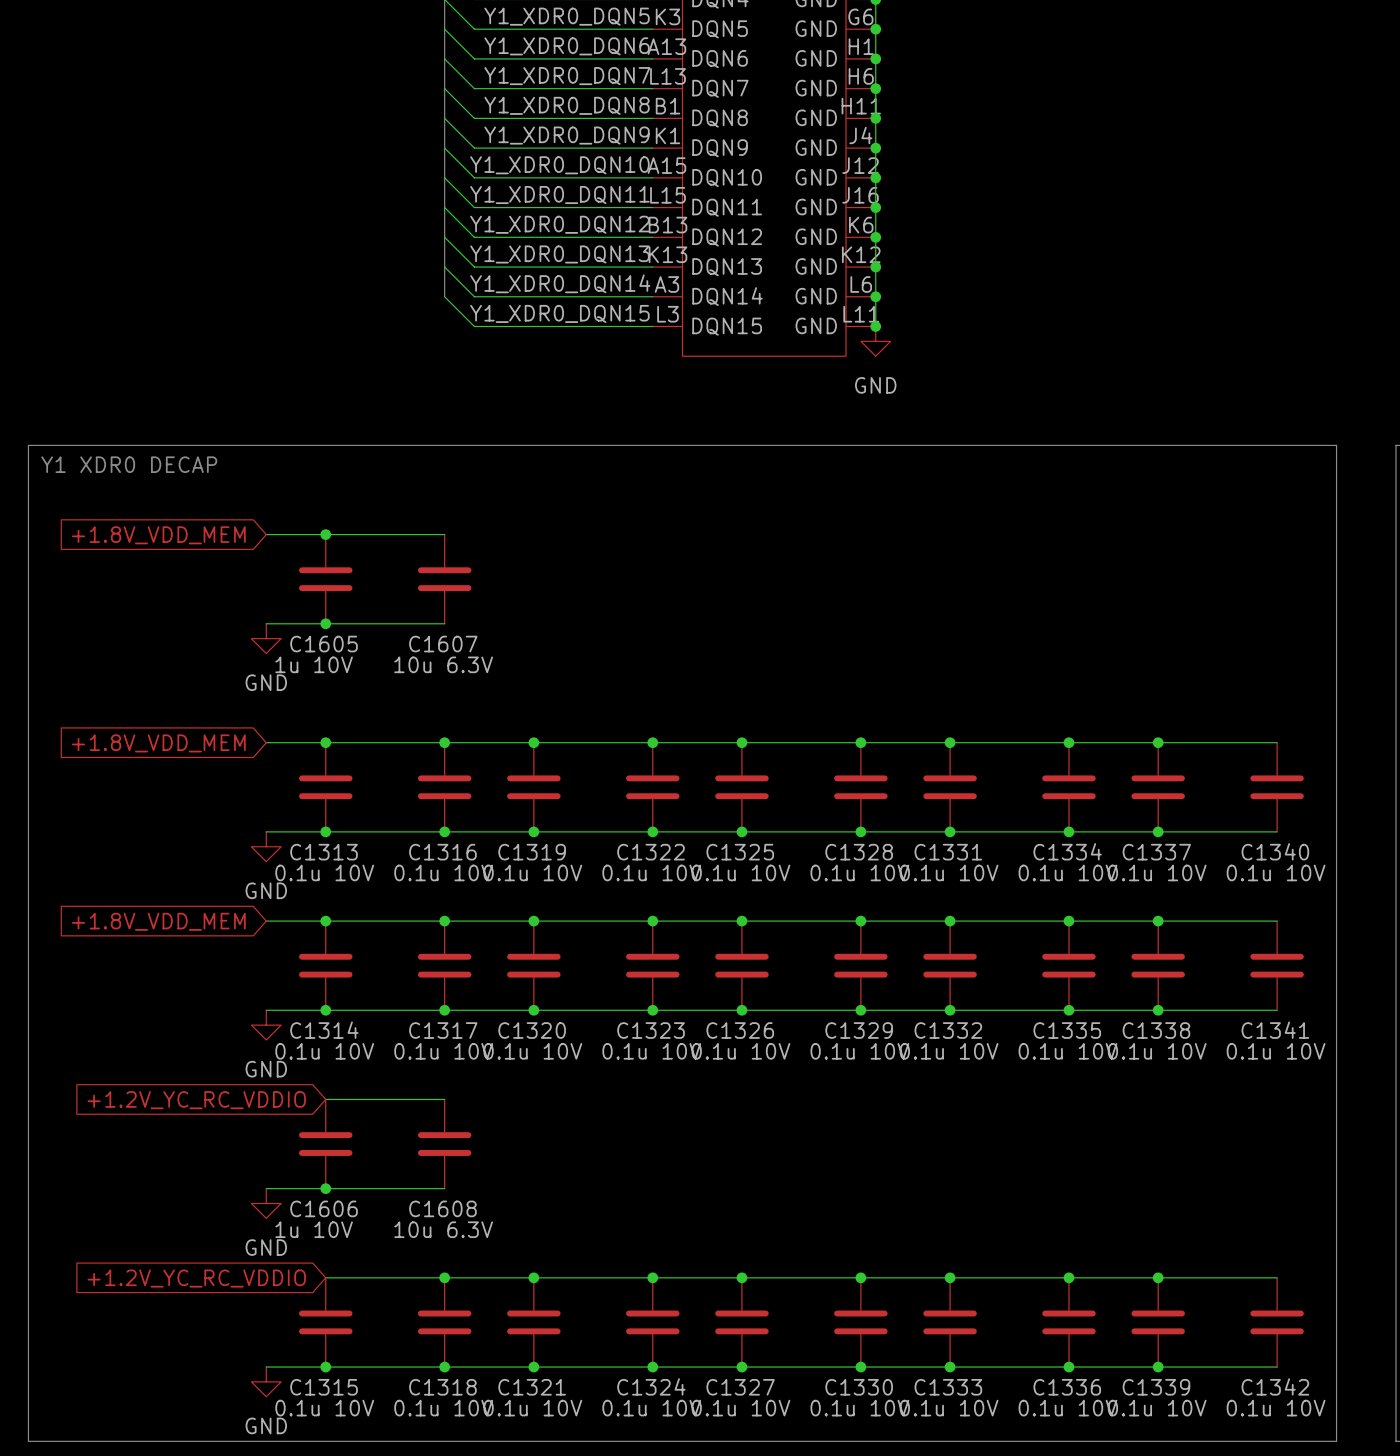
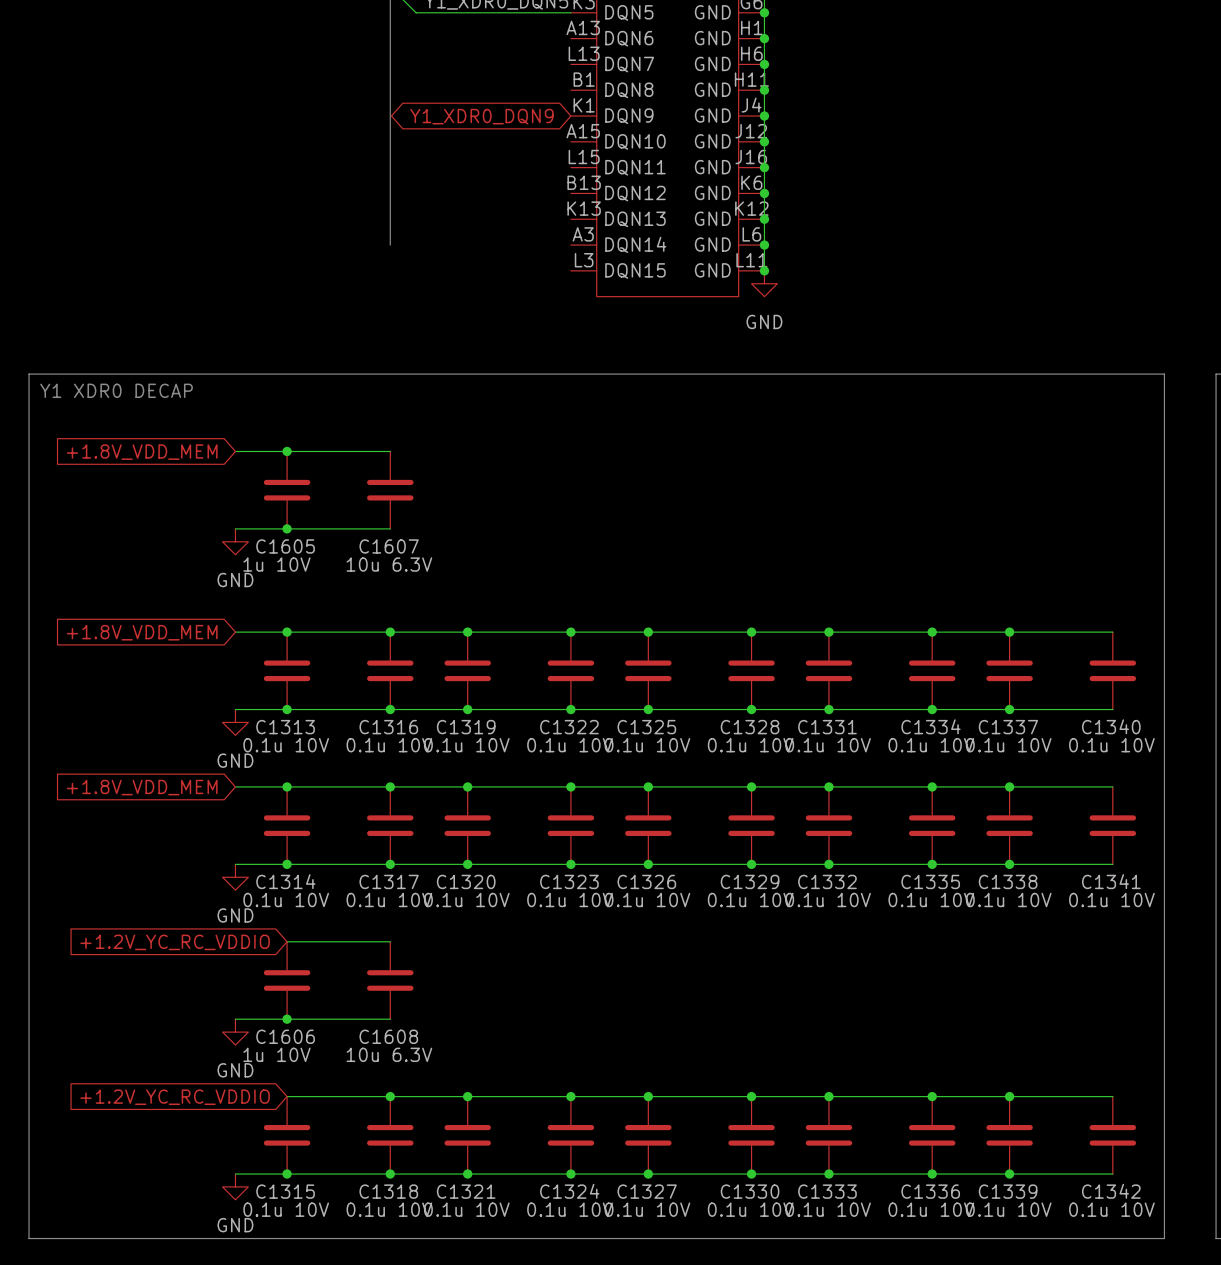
wire: (444, 29) (474, 58) (652, 58) -> none
label: Y1_XDR0_DQN6 (567, 46) -> none
wire: (444, 58) (474, 88) (652, 88) -> none
label: Y1_XDR0_DQN7 (567, 76) -> none
wire: (444, 88) (474, 118) (652, 118) -> none
label: Y1_XDR0_DQN8 (567, 105) -> none
wire: (444, 118) (474, 148) (652, 148) -> none
label: Y1_XDR0_DQN9 (567, 135) -> none
wire: (444, 148) (474, 177) (652, 177) -> none
global label: none -> Y1_XDR0_DQN9 (481, 116)
label: Y1_XDR0_DQN10 (559, 165) -> none
wire: (444, 177) (474, 207) (652, 207) -> none
label: Y1_XDR0_DQN11 (559, 195) -> none
wire: (444, 207) (474, 237) (652, 237) -> none
label: Y1_XDR0_DQN12 (559, 224) -> none
wire: (444, 237) (474, 267) (652, 267) -> none
label: Y1_XDR0_DQN13 (559, 254) -> none
wire: (444, 267) (474, 296) (652, 296) -> none
label: Y1_XDR0_DQN14 (560, 283) -> none
wire: (444, 296) (474, 326) (652, 326) -> none
label: Y1_XDR0_DQN15 (559, 313) -> none

